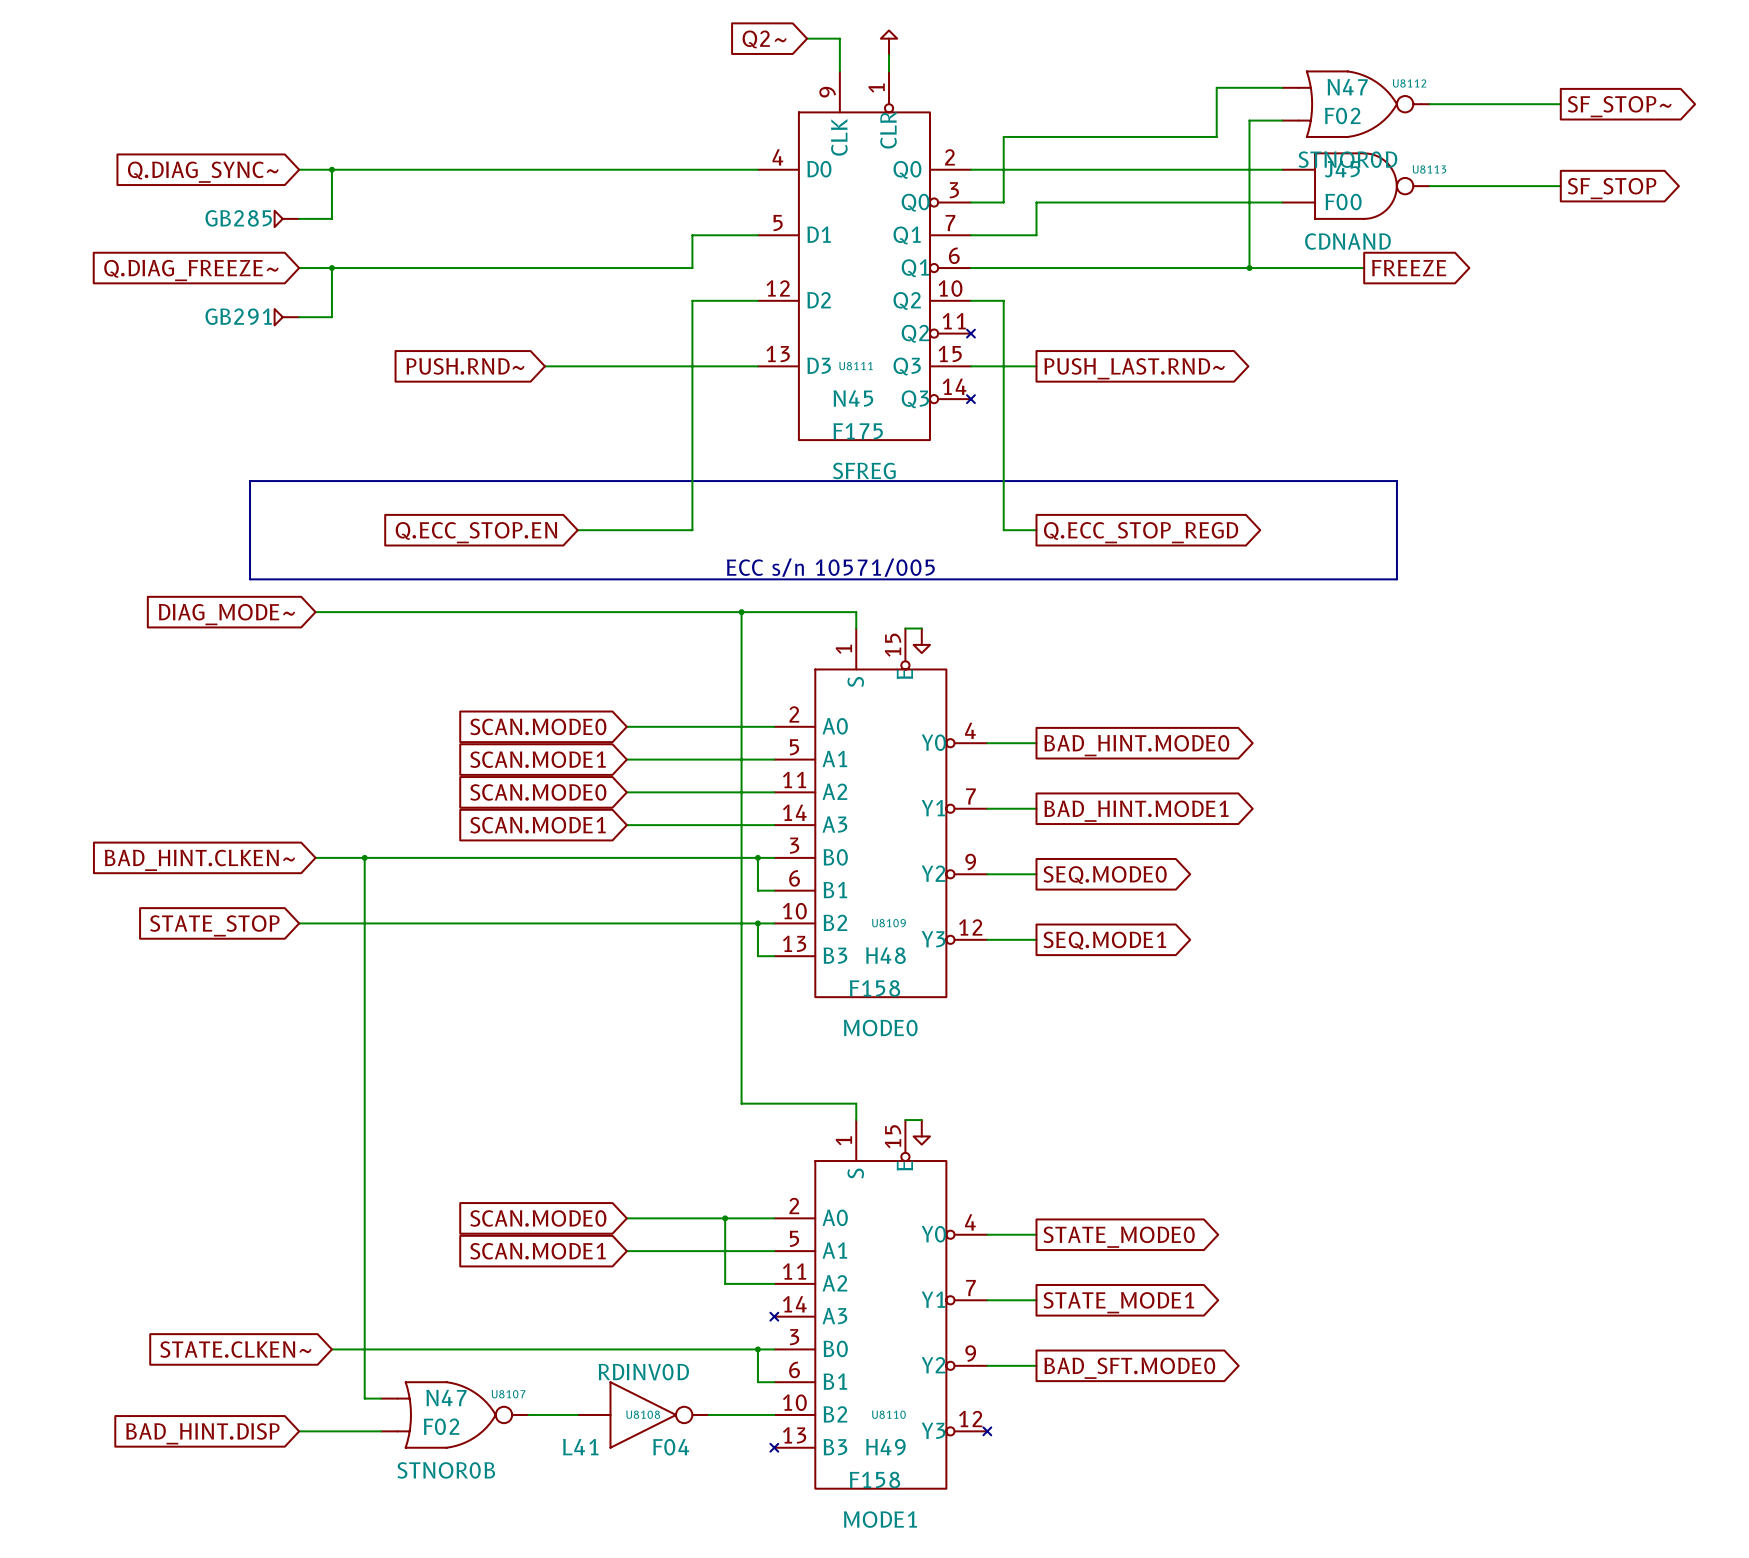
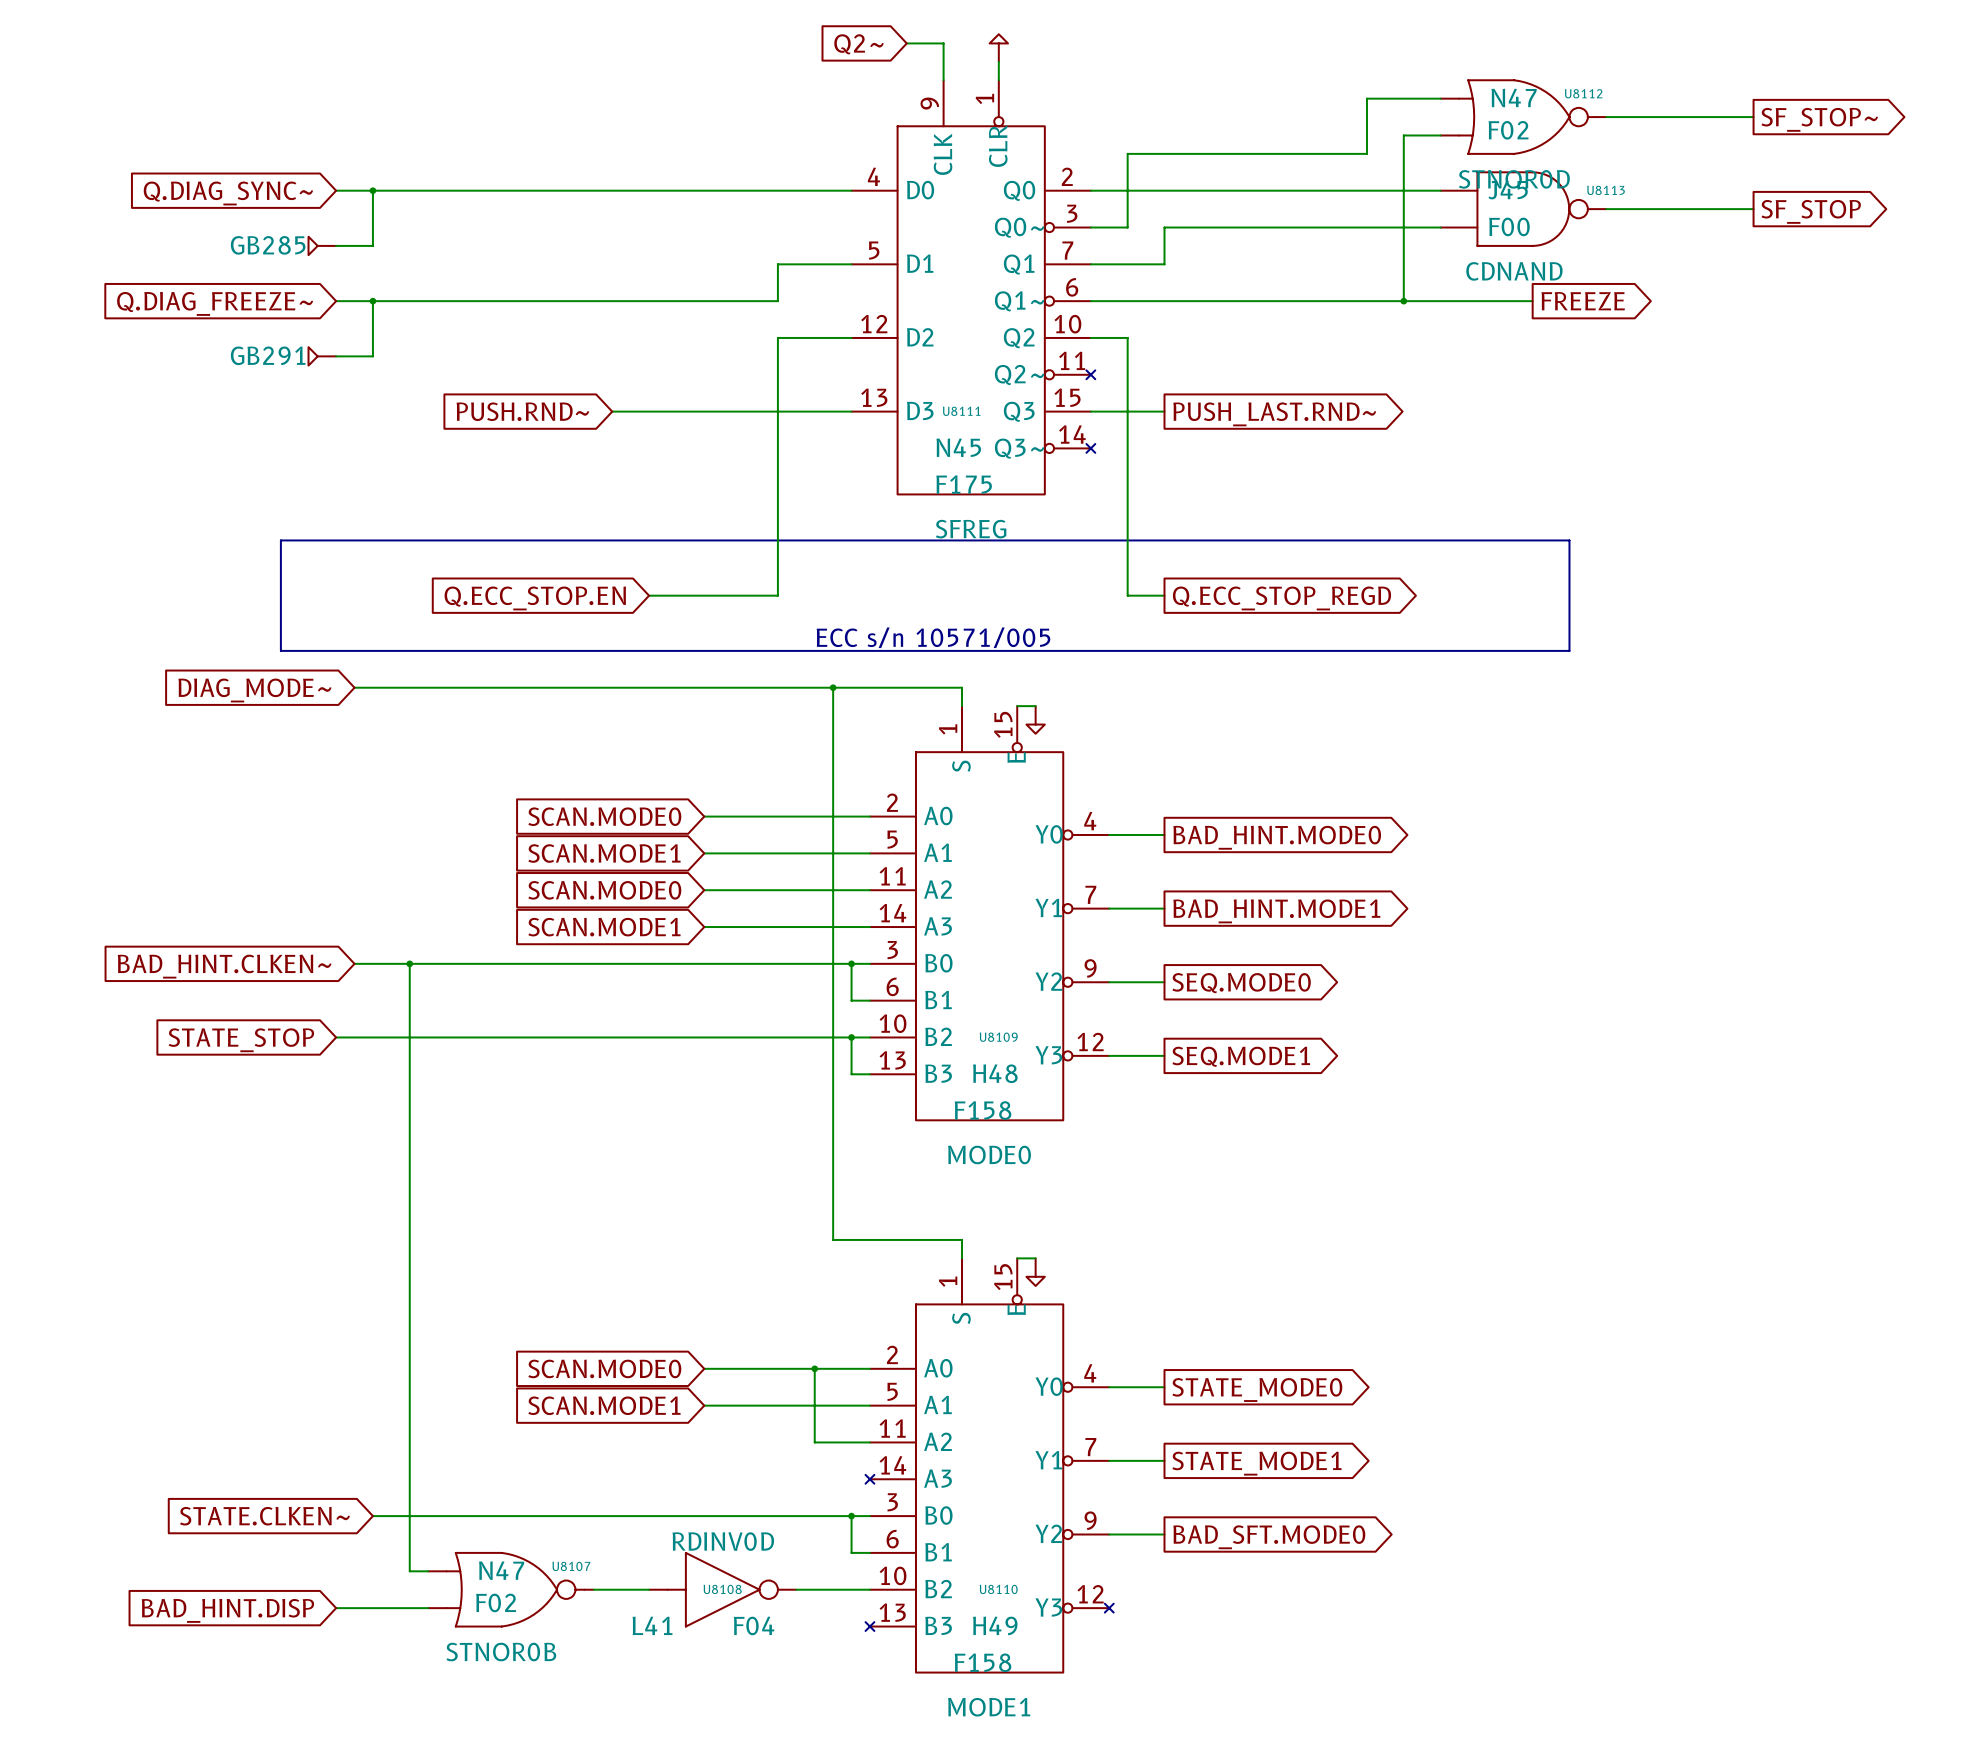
U8111 pin name: Q0 (915, 202) -> Q0~ (1019, 227)
U8111 pin name: Q1 (915, 268) -> Q1~ (1019, 301)
U8111 pin name: Q2 (915, 333) -> Q2~ (1019, 374)
U8111 pin name: Q3 (915, 399) -> Q3~ (1019, 448)

